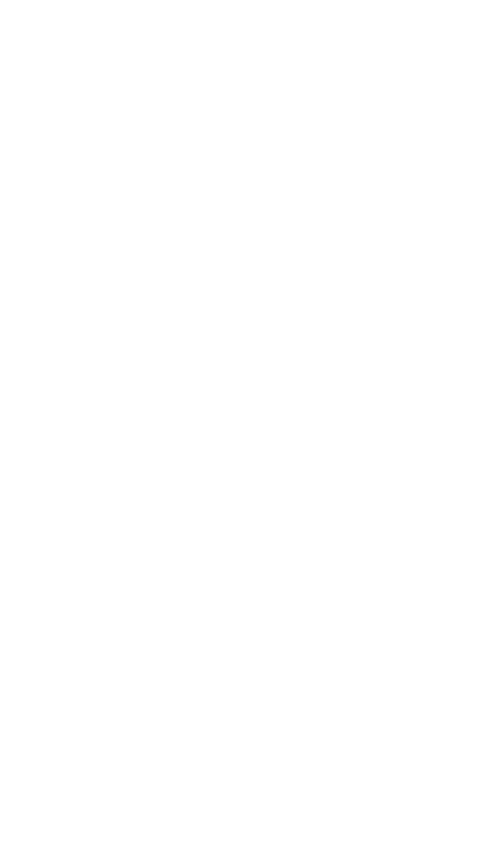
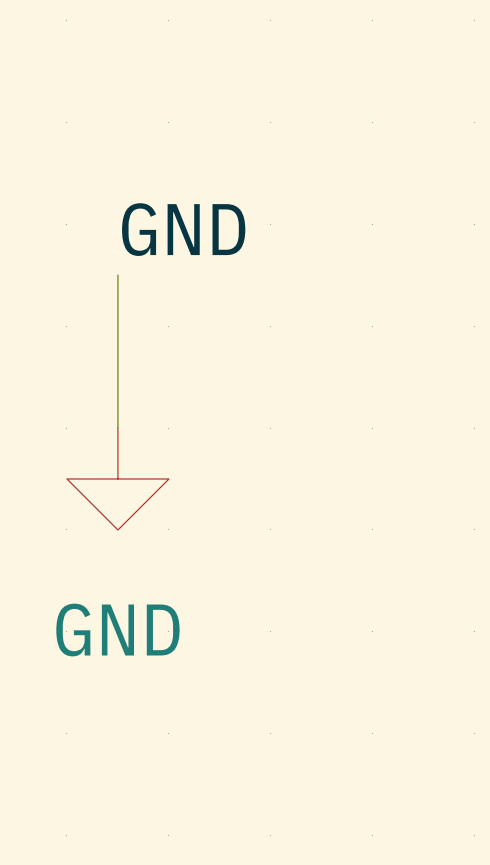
label: none -> GND (183, 229)
wire: none -> (117, 275) (117, 428)
power symbol: none -> GND (117, 478)

